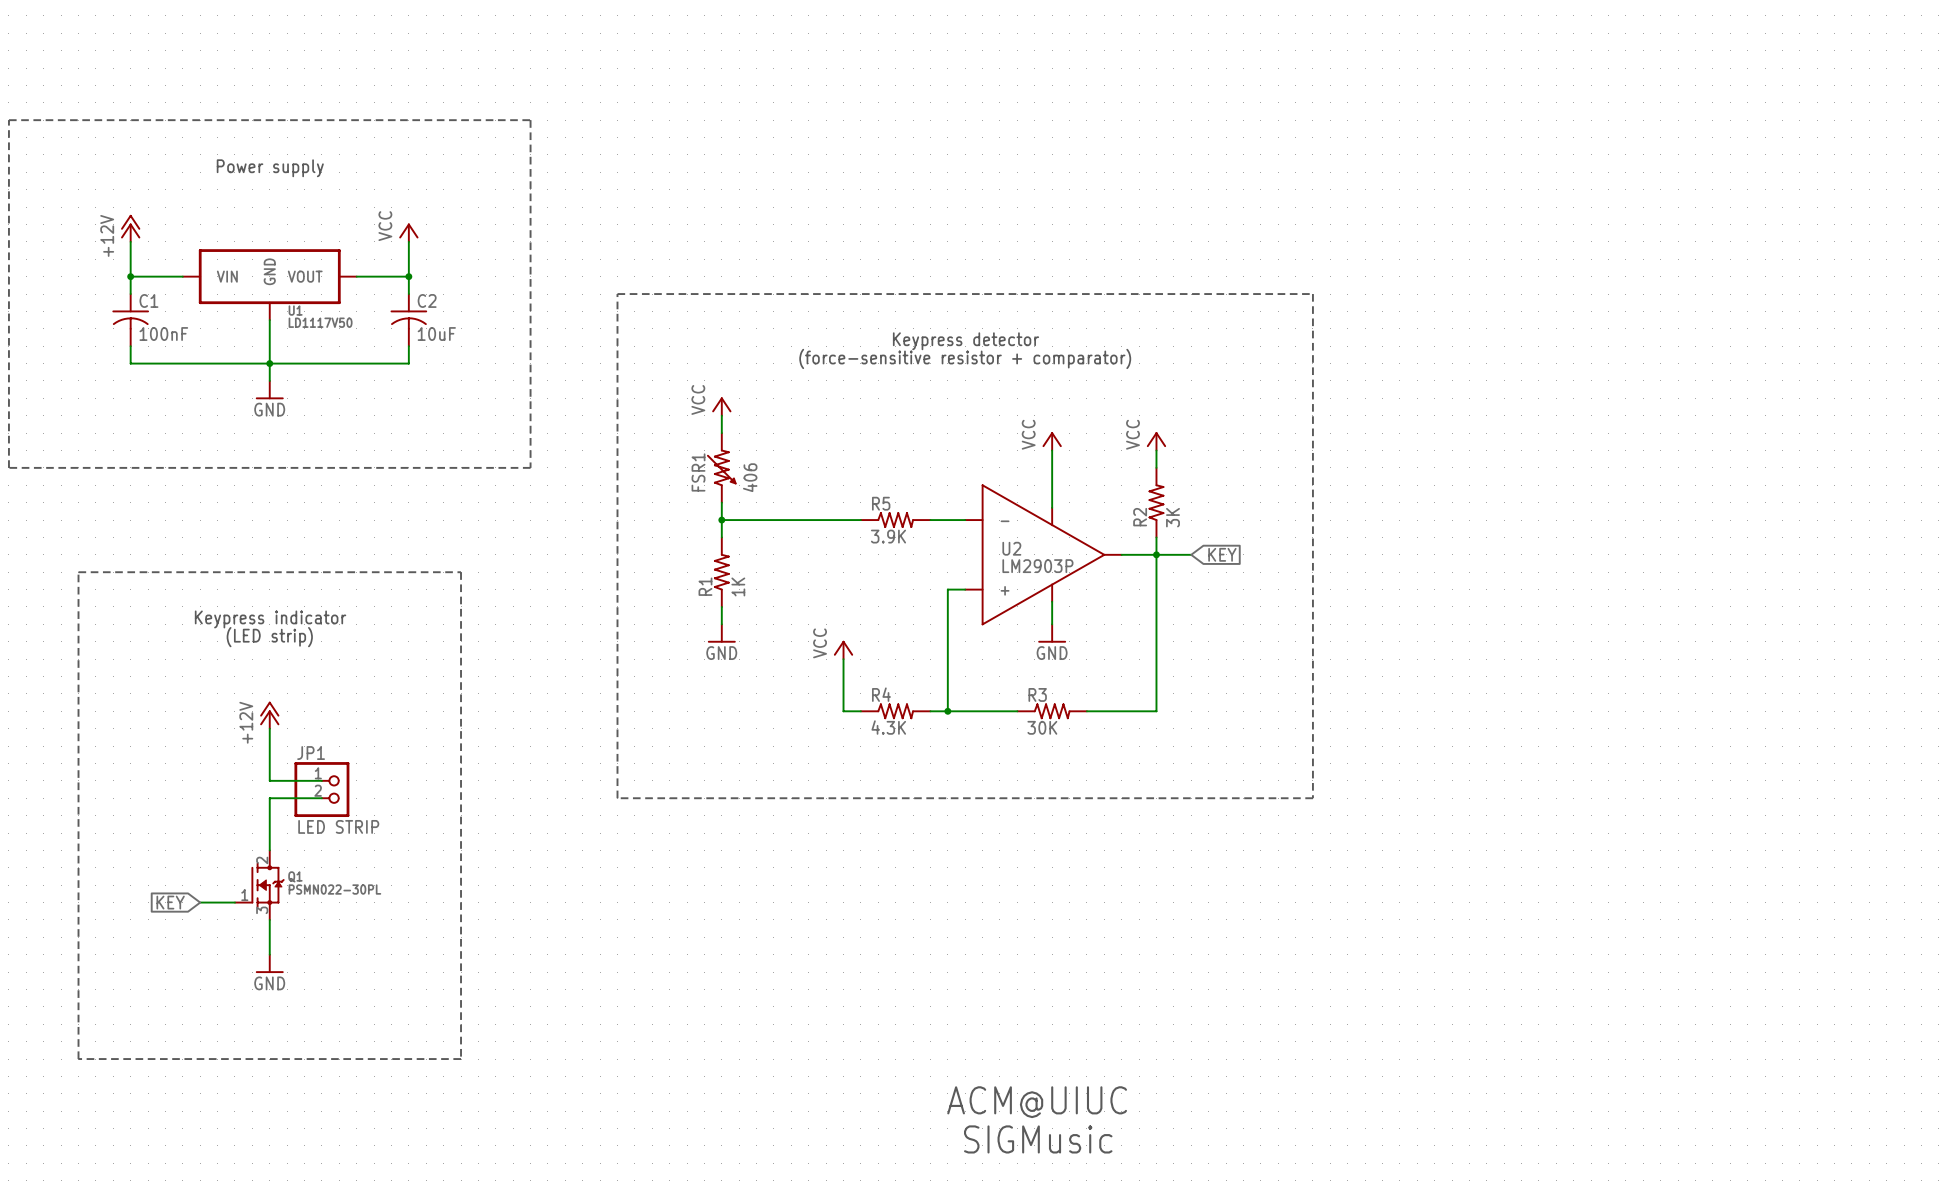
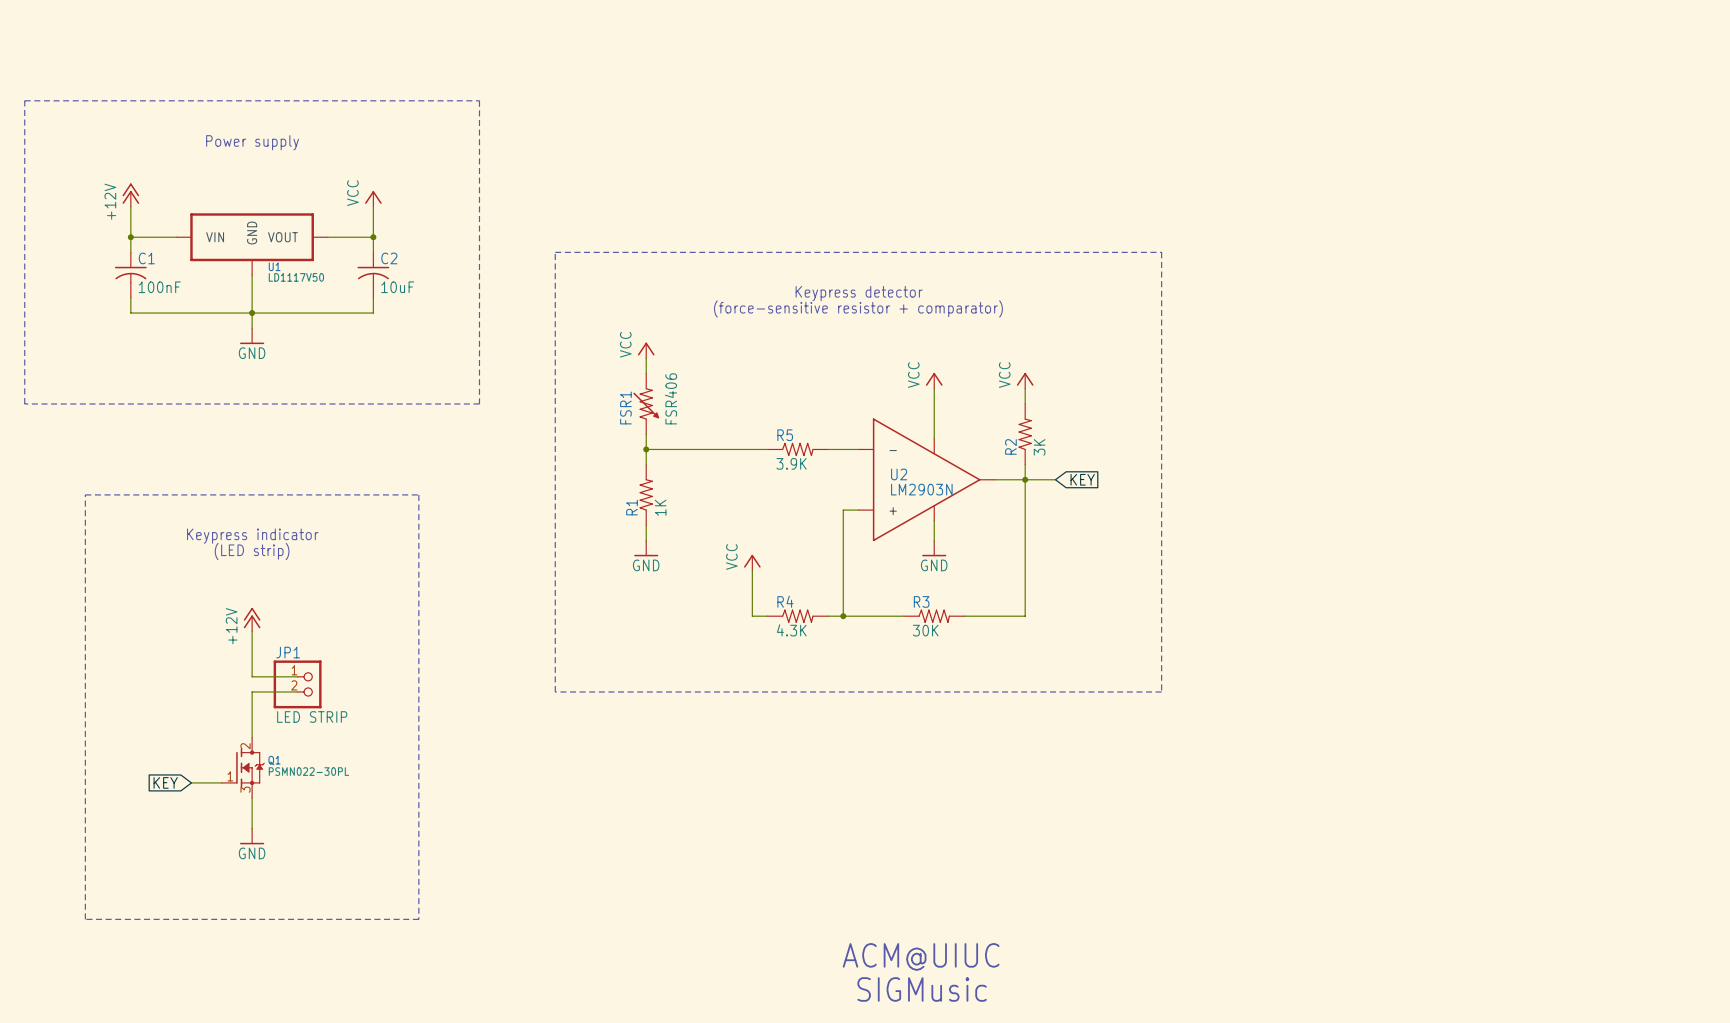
FSR1 value: 406 (750, 477) -> FSR406 (670, 398)
U2 value: LM2903P (1037, 566) -> LM2903N (921, 489)

